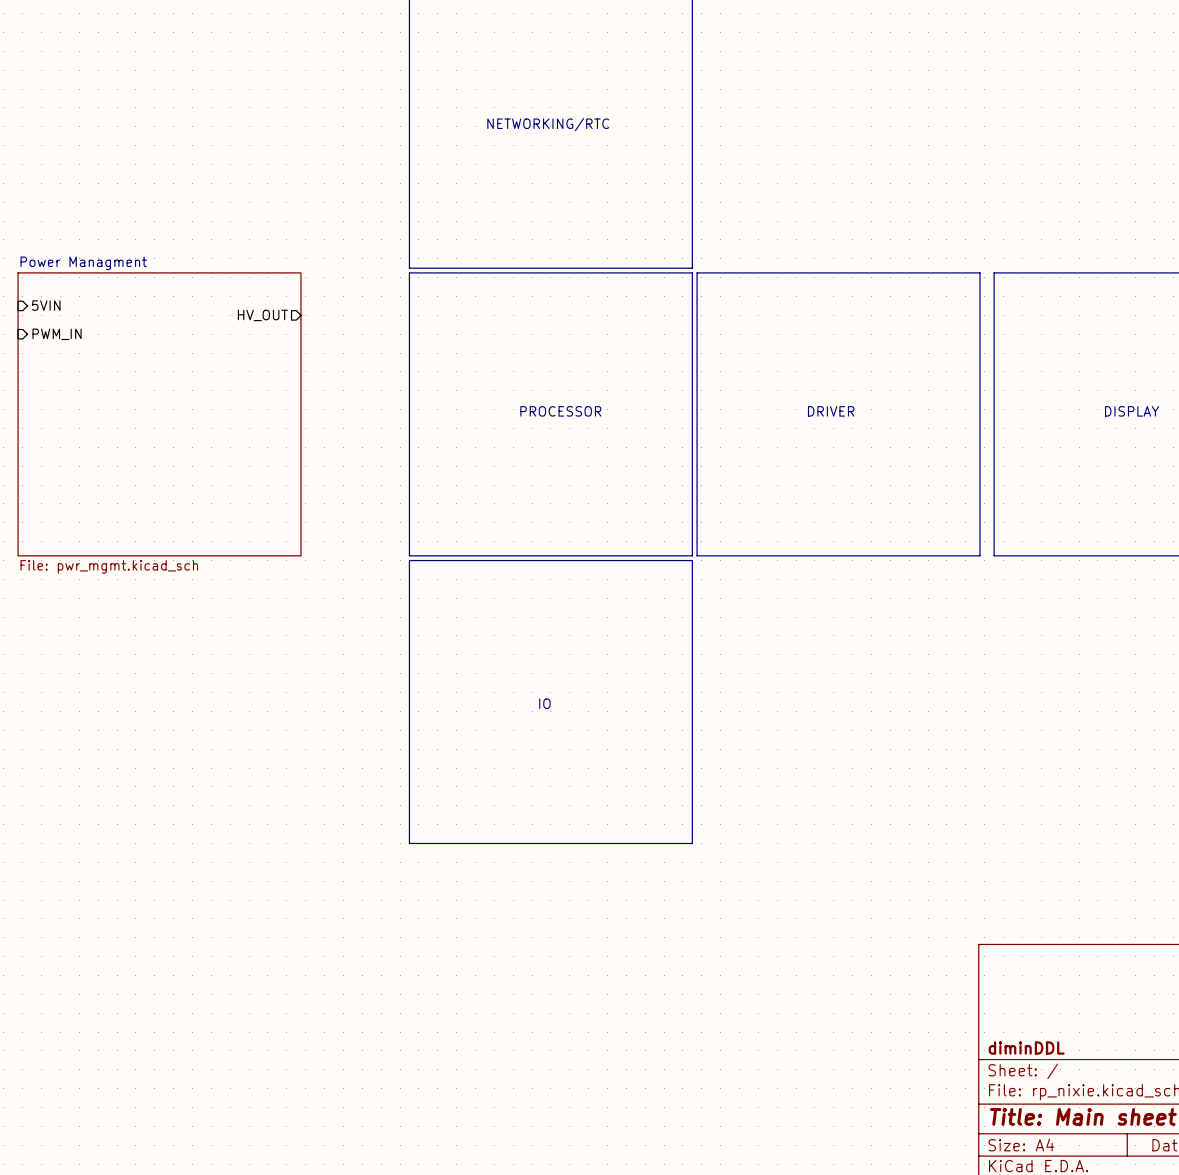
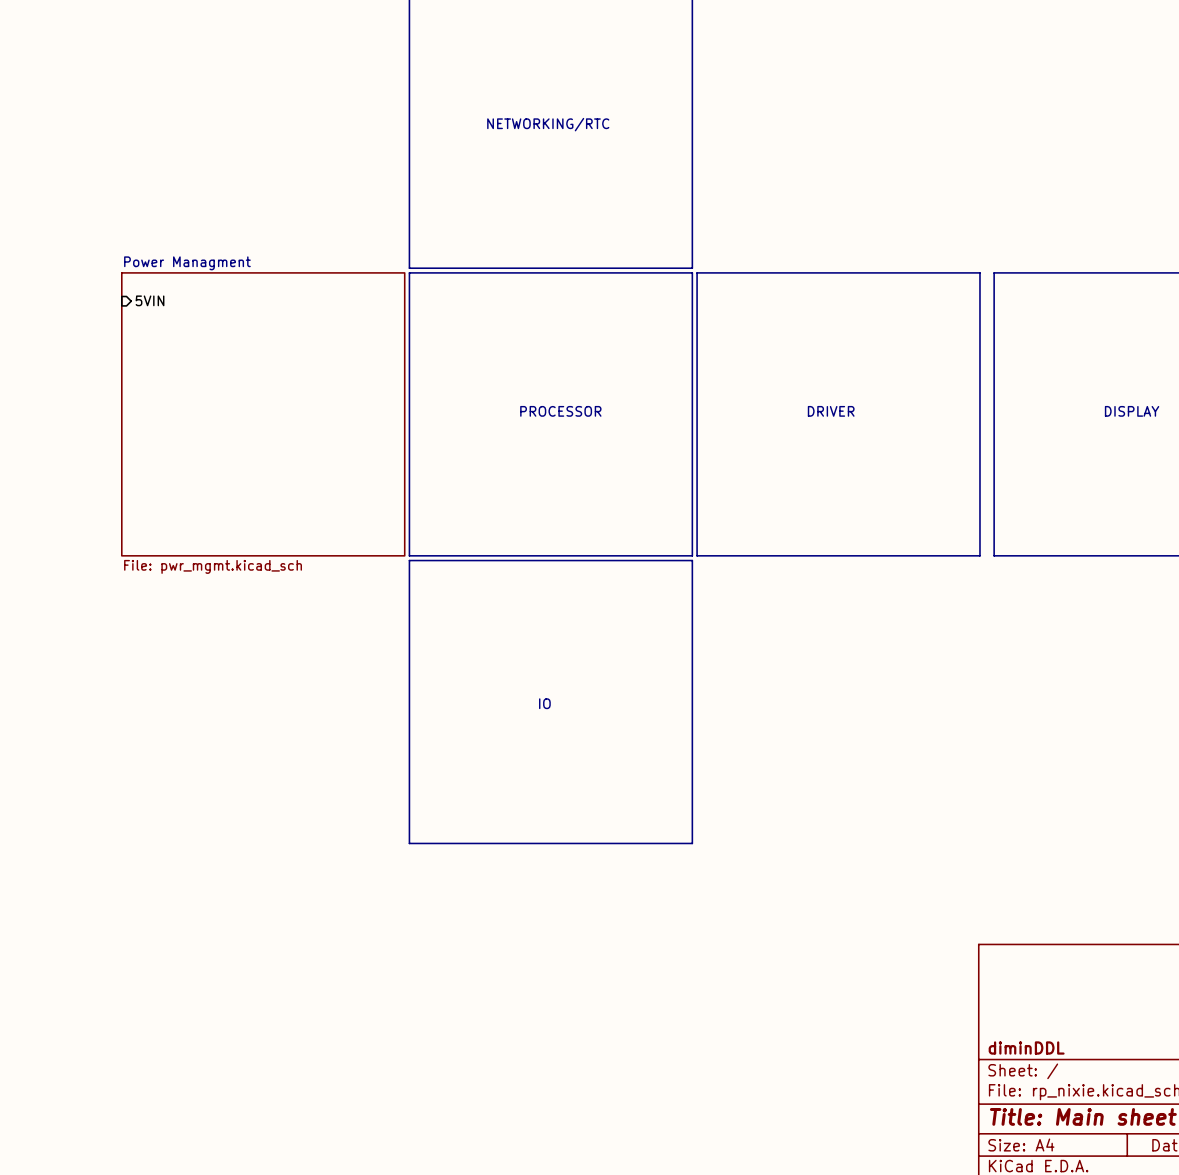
sheet pin position: 5VIN (46, 305) -> 5VIN (150, 300)
sheet pin: HV_OUT (262, 315) -> none
sheet pin: PWM_IN (57, 334) -> none
sheet Power Managment position: (159, 414) -> (263, 414)

